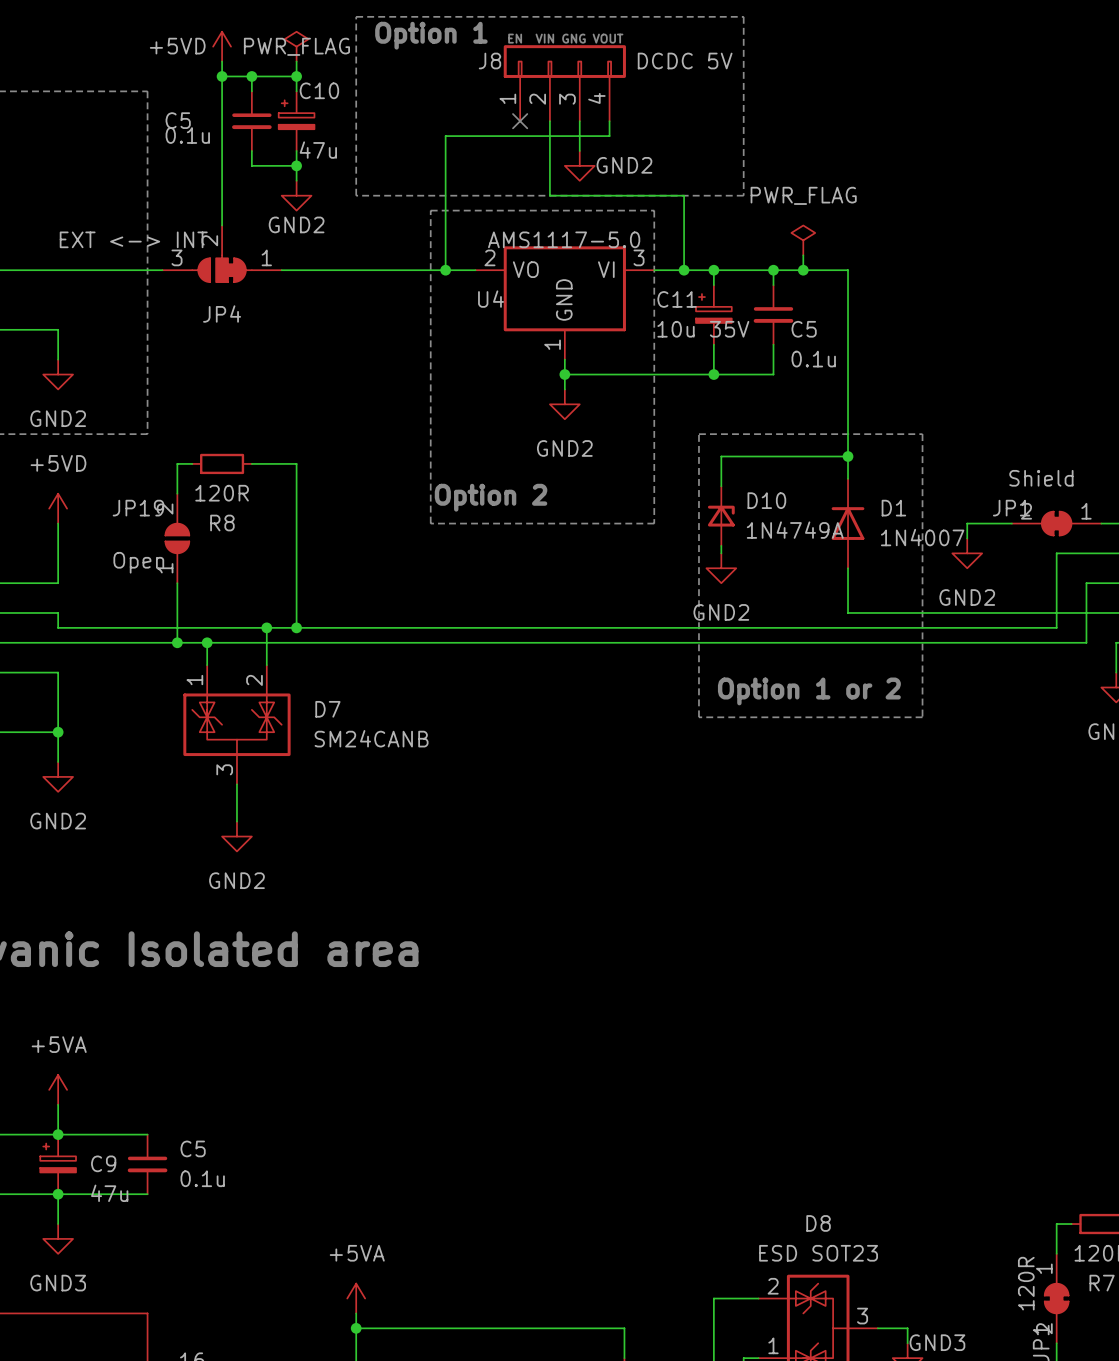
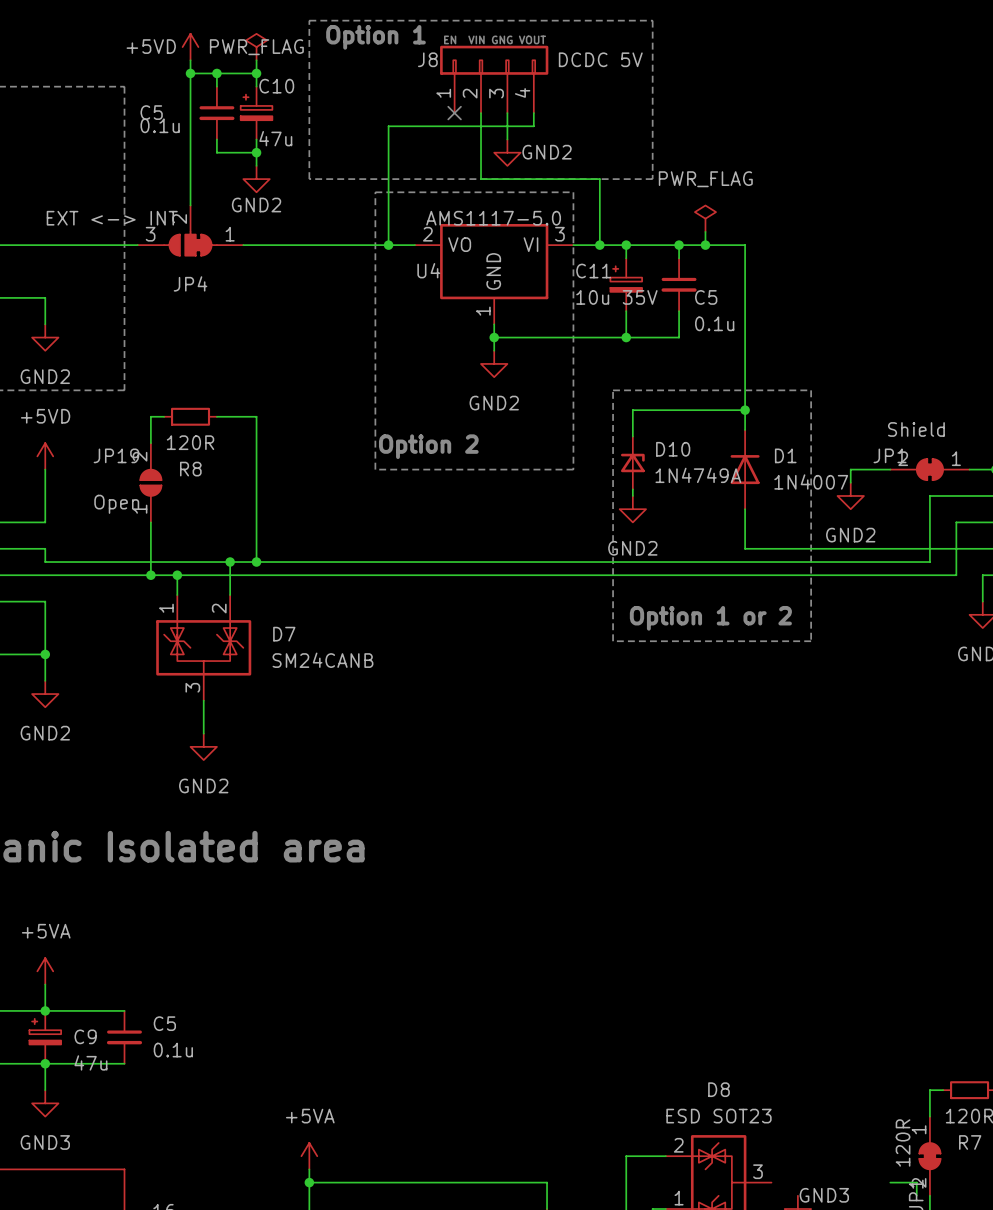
wire: (877, 1328) (907, 1328) (907, 1343) -> (890, 1182) (916, 1182) (916, 1195)

